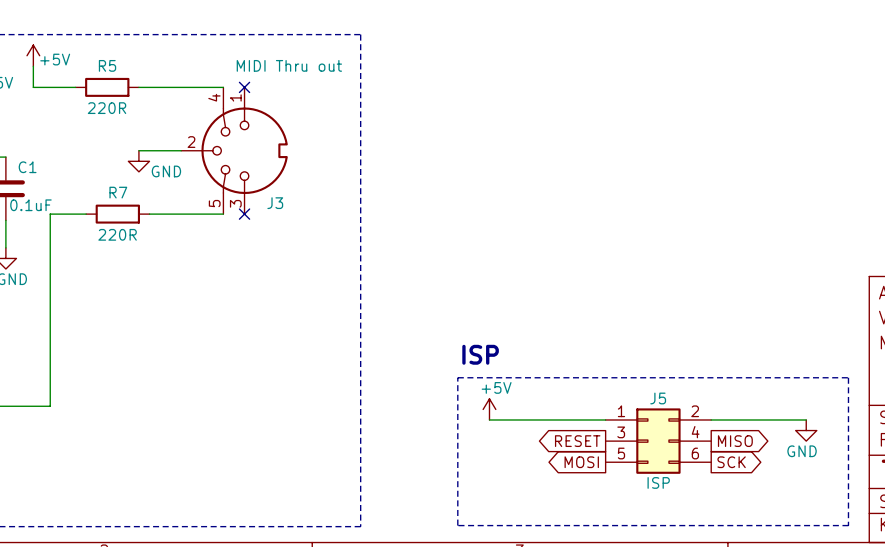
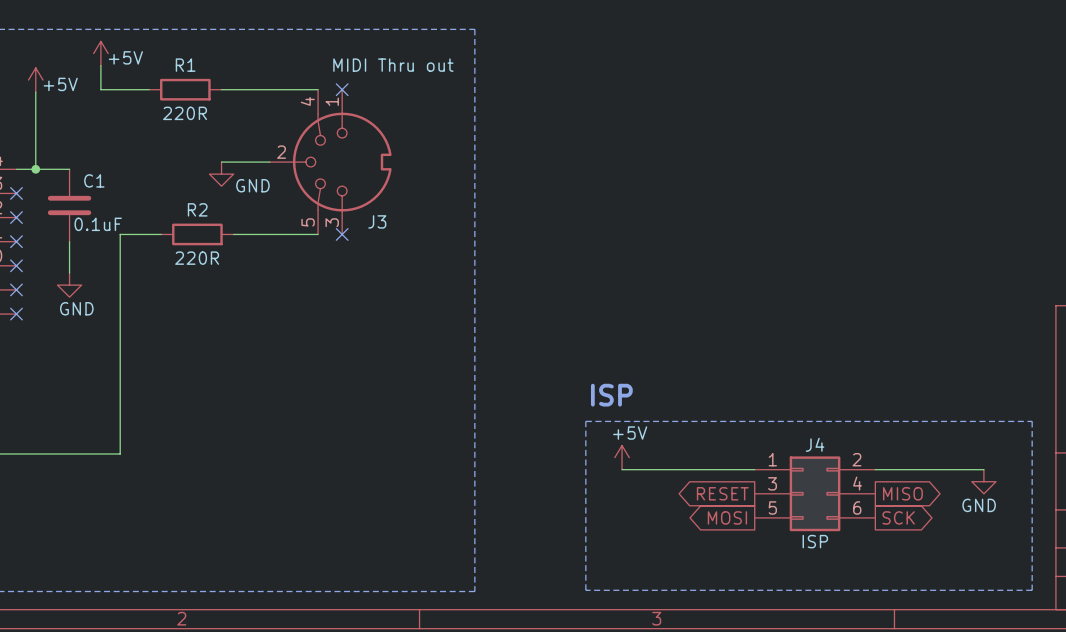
R5 name: R5 (107, 65) -> R1 (185, 65)
R7 name: R7 (118, 192) -> R2 (197, 209)
J5 name: J5 (658, 398) -> J4 (815, 444)

